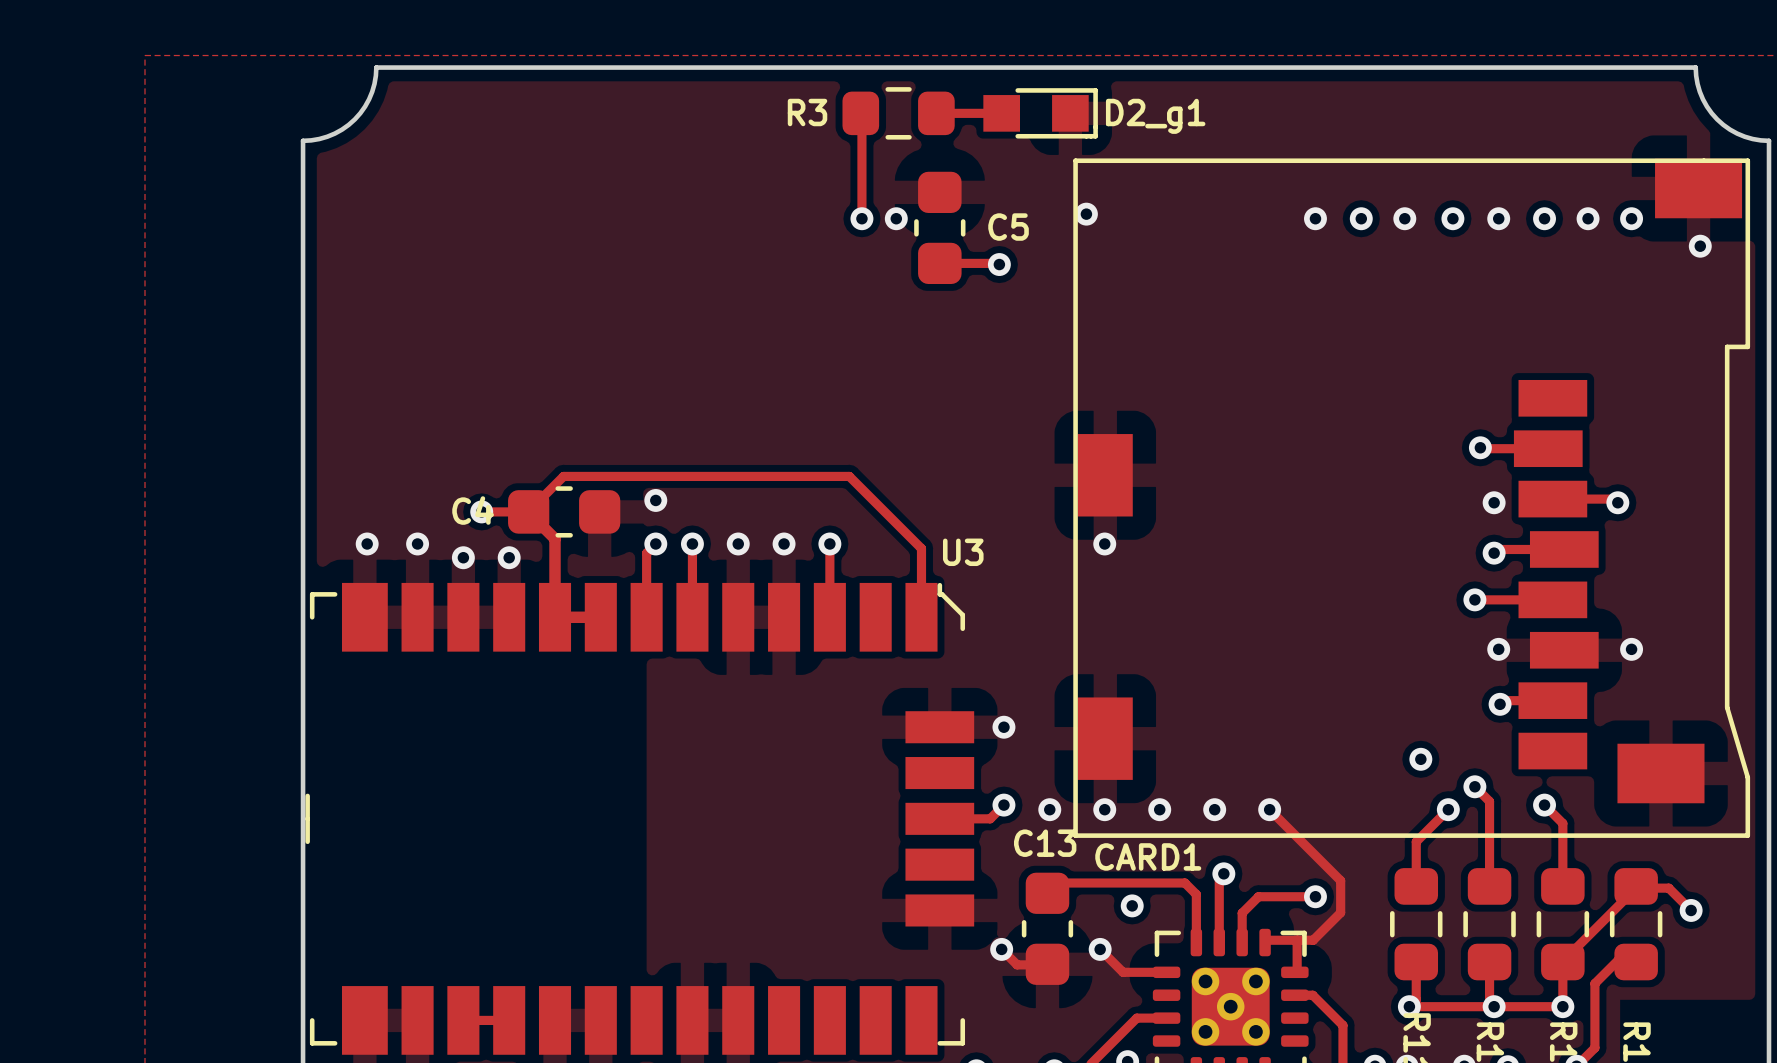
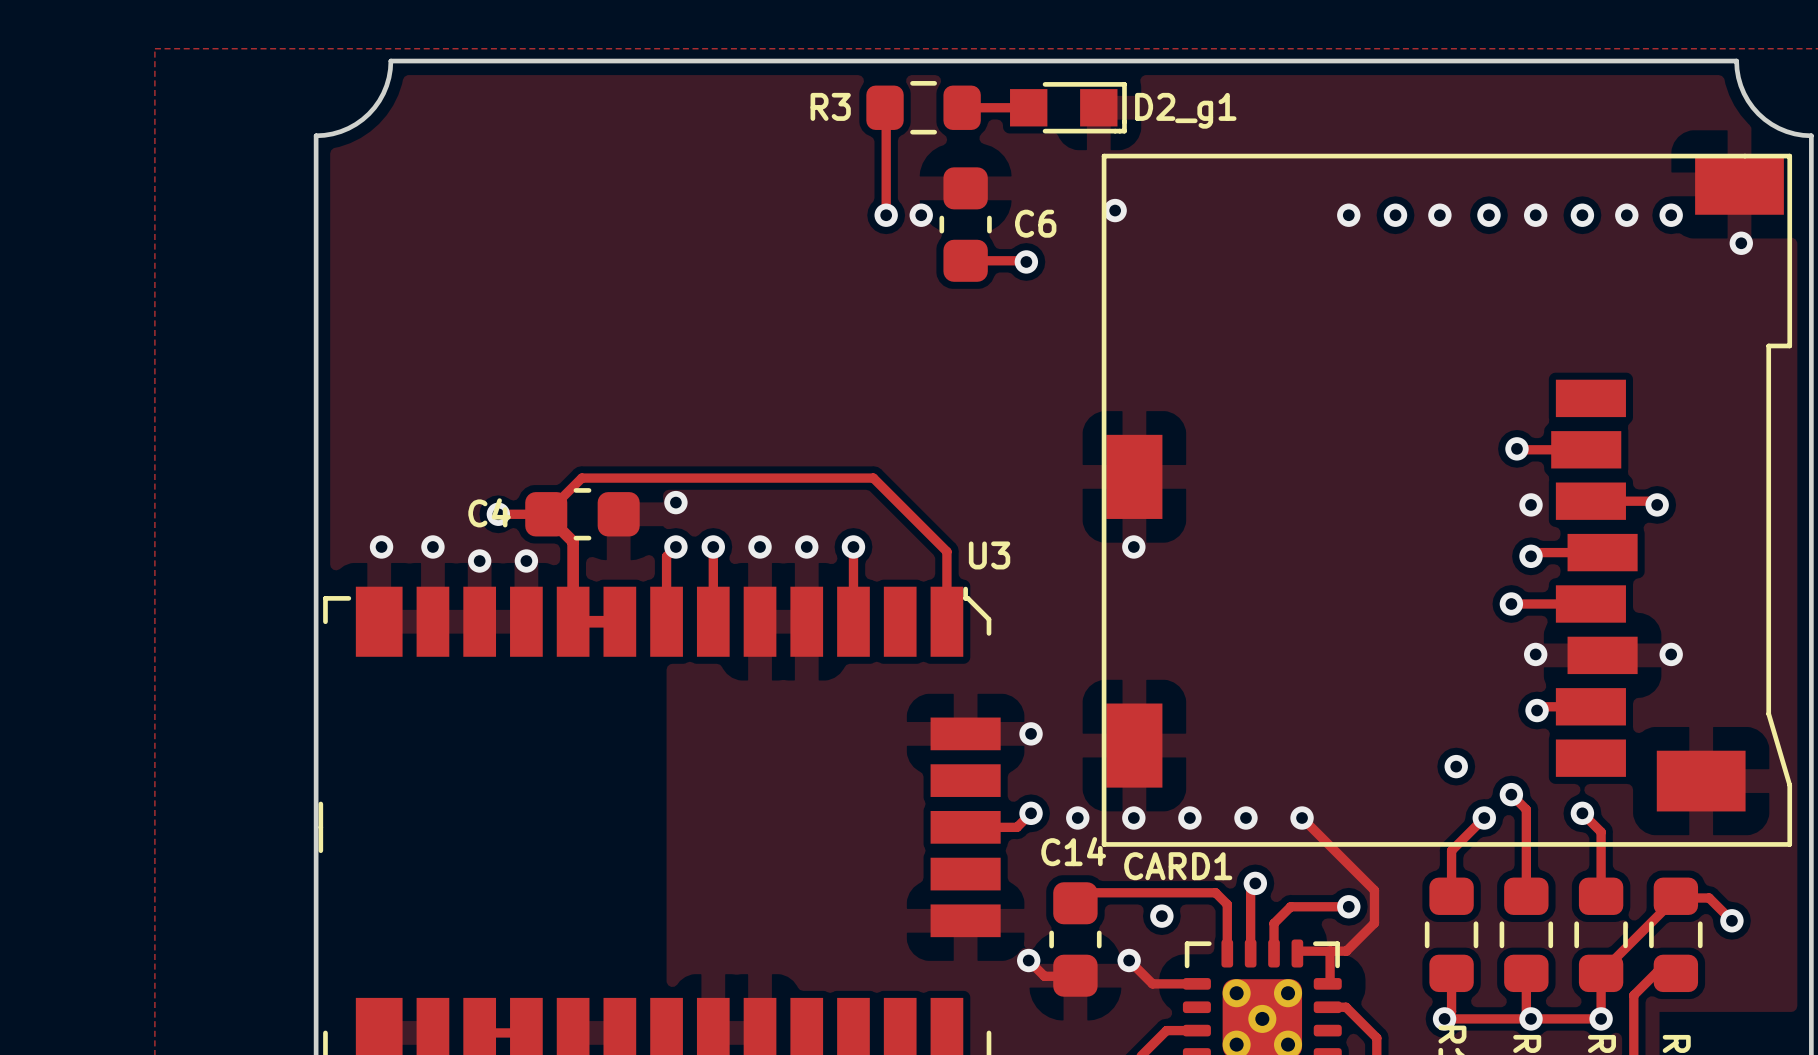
C5 name: C5 (1008, 227) -> C6 (1035, 223)
C13 name: C13 (1045, 843) -> C14 (1073, 851)

